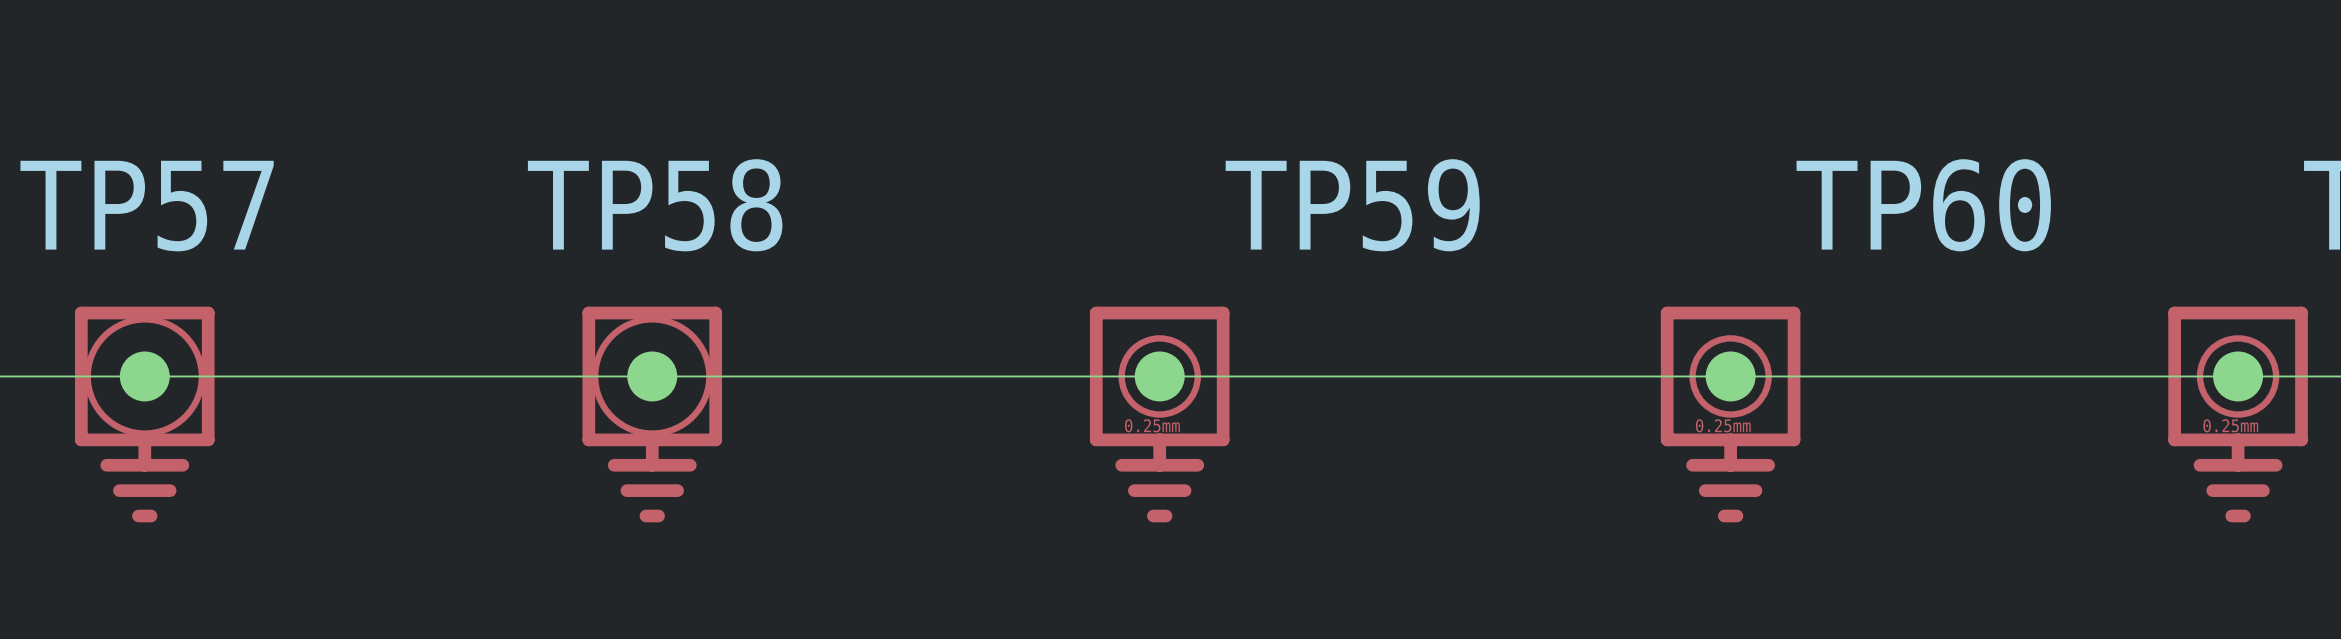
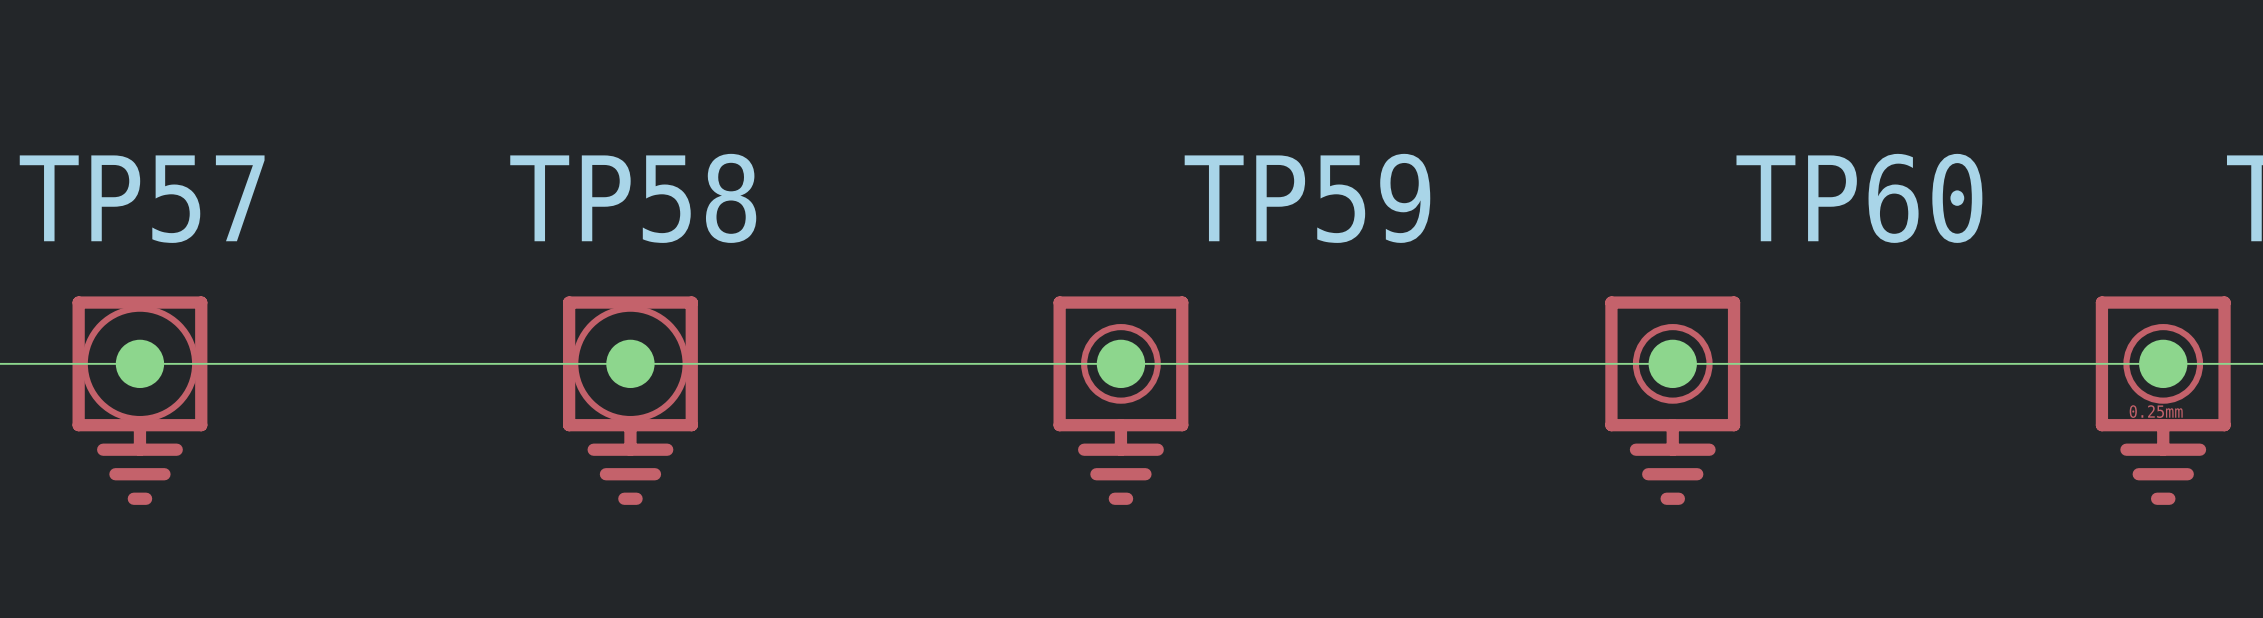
TP59 text: 0.25mm (1152, 425) -> none
TP60 text: 0.25mm (1723, 425) -> none

